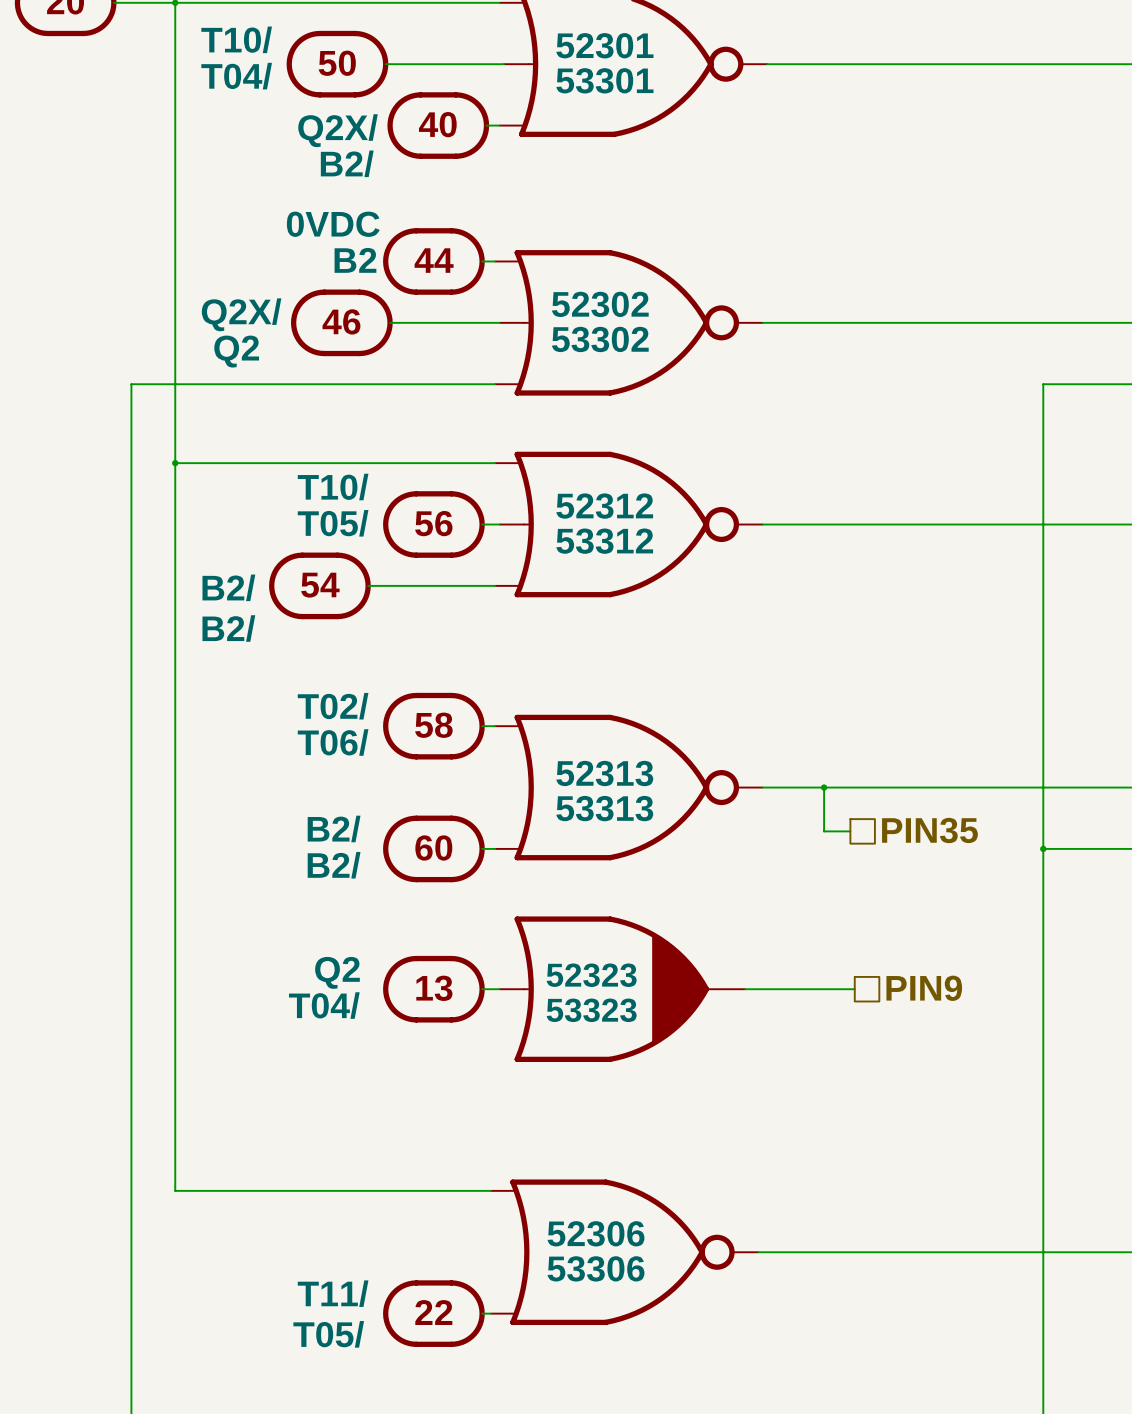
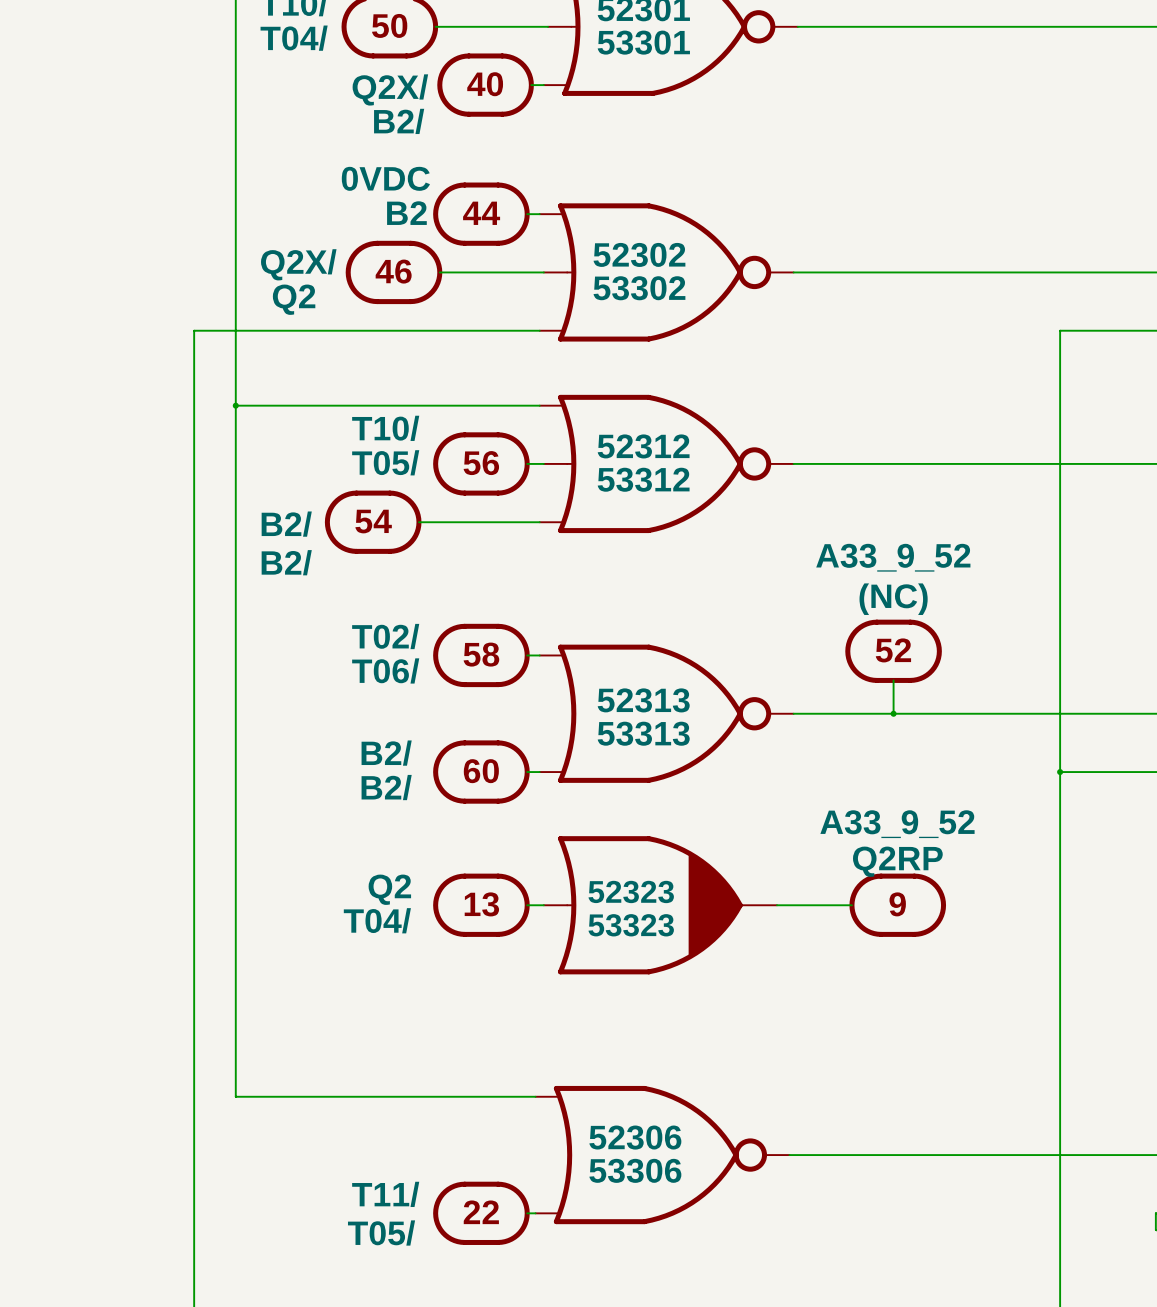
part: none -> (893, 651)
wire: none -> (893, 680) (893, 713)
wire: (824, 787) (824, 831) (850, 831) -> none
junction: (824, 787) -> none
junction: none -> (893, 713)
hierarchical label: PIN35 (929, 830) -> none
hierarchical label: PIN9 (924, 988) -> none
wire: (824, 989) (854, 989) -> none
part: none -> (897, 905)

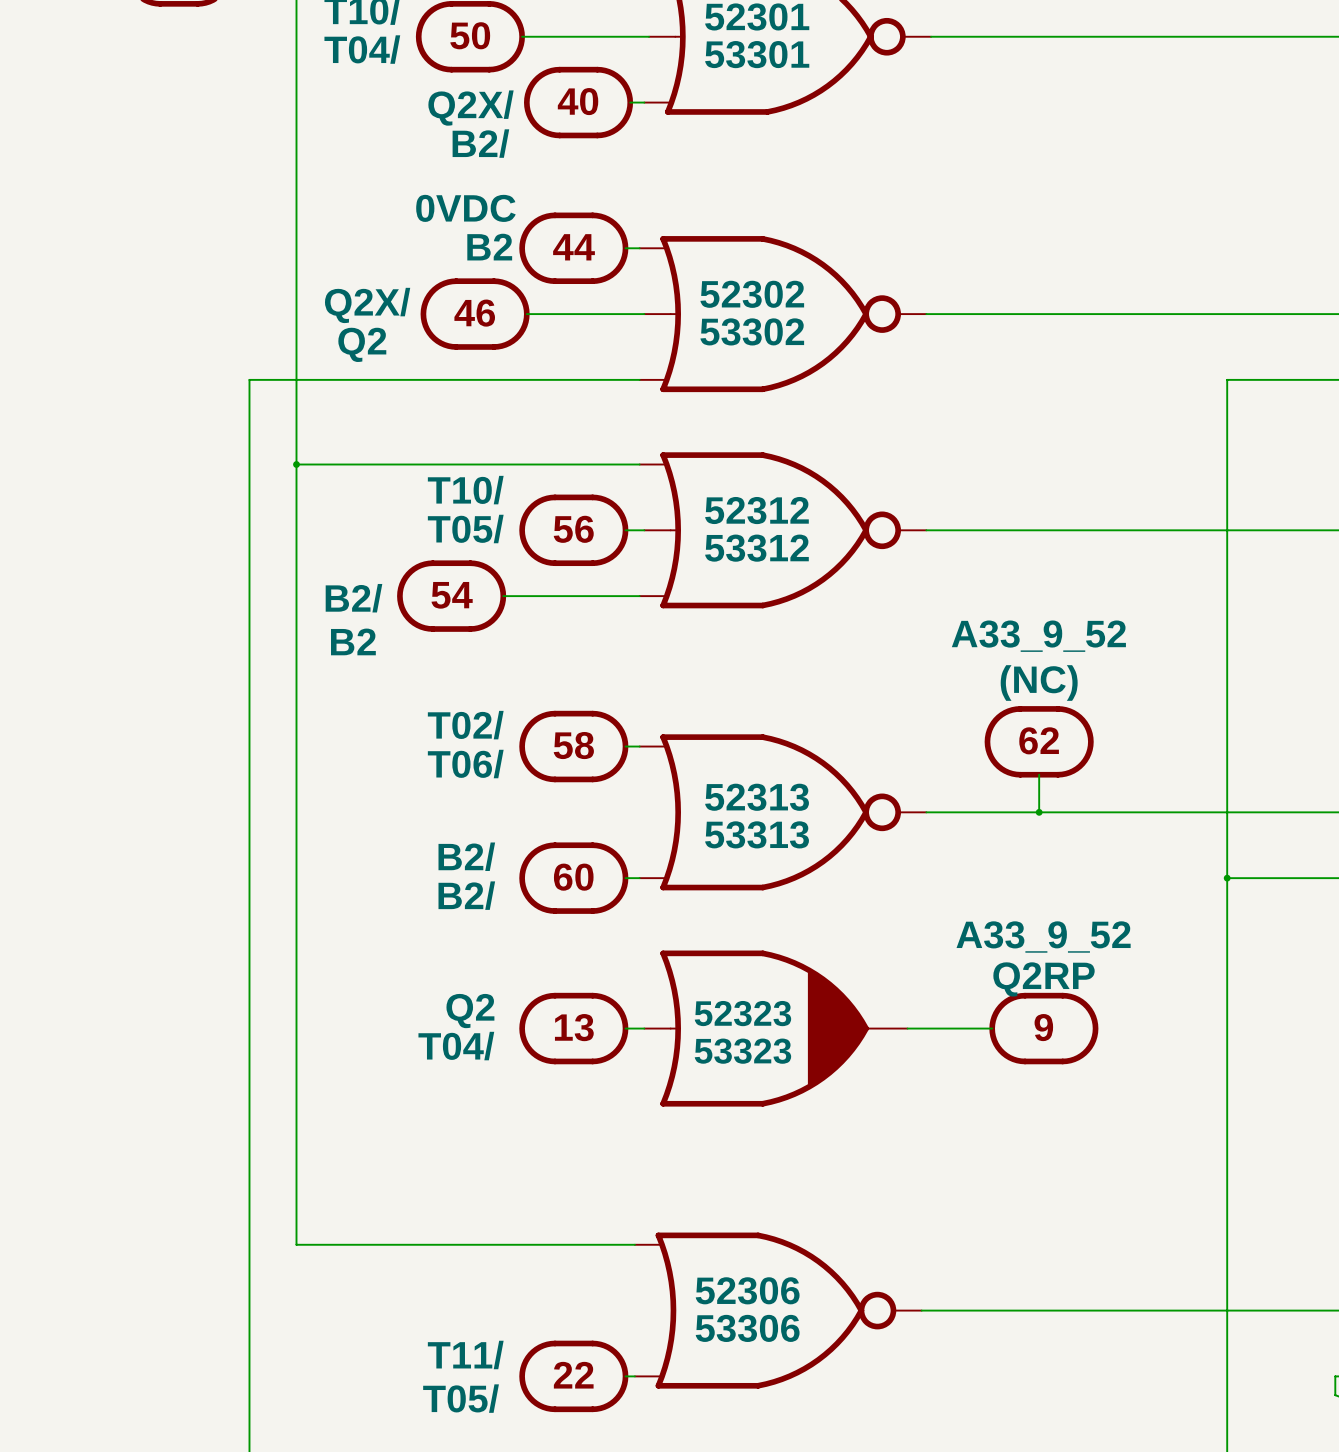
part text: B2/ (286, 562) -> B2 (353, 641)
part text: 52 (893, 650) -> 62 (1039, 740)

